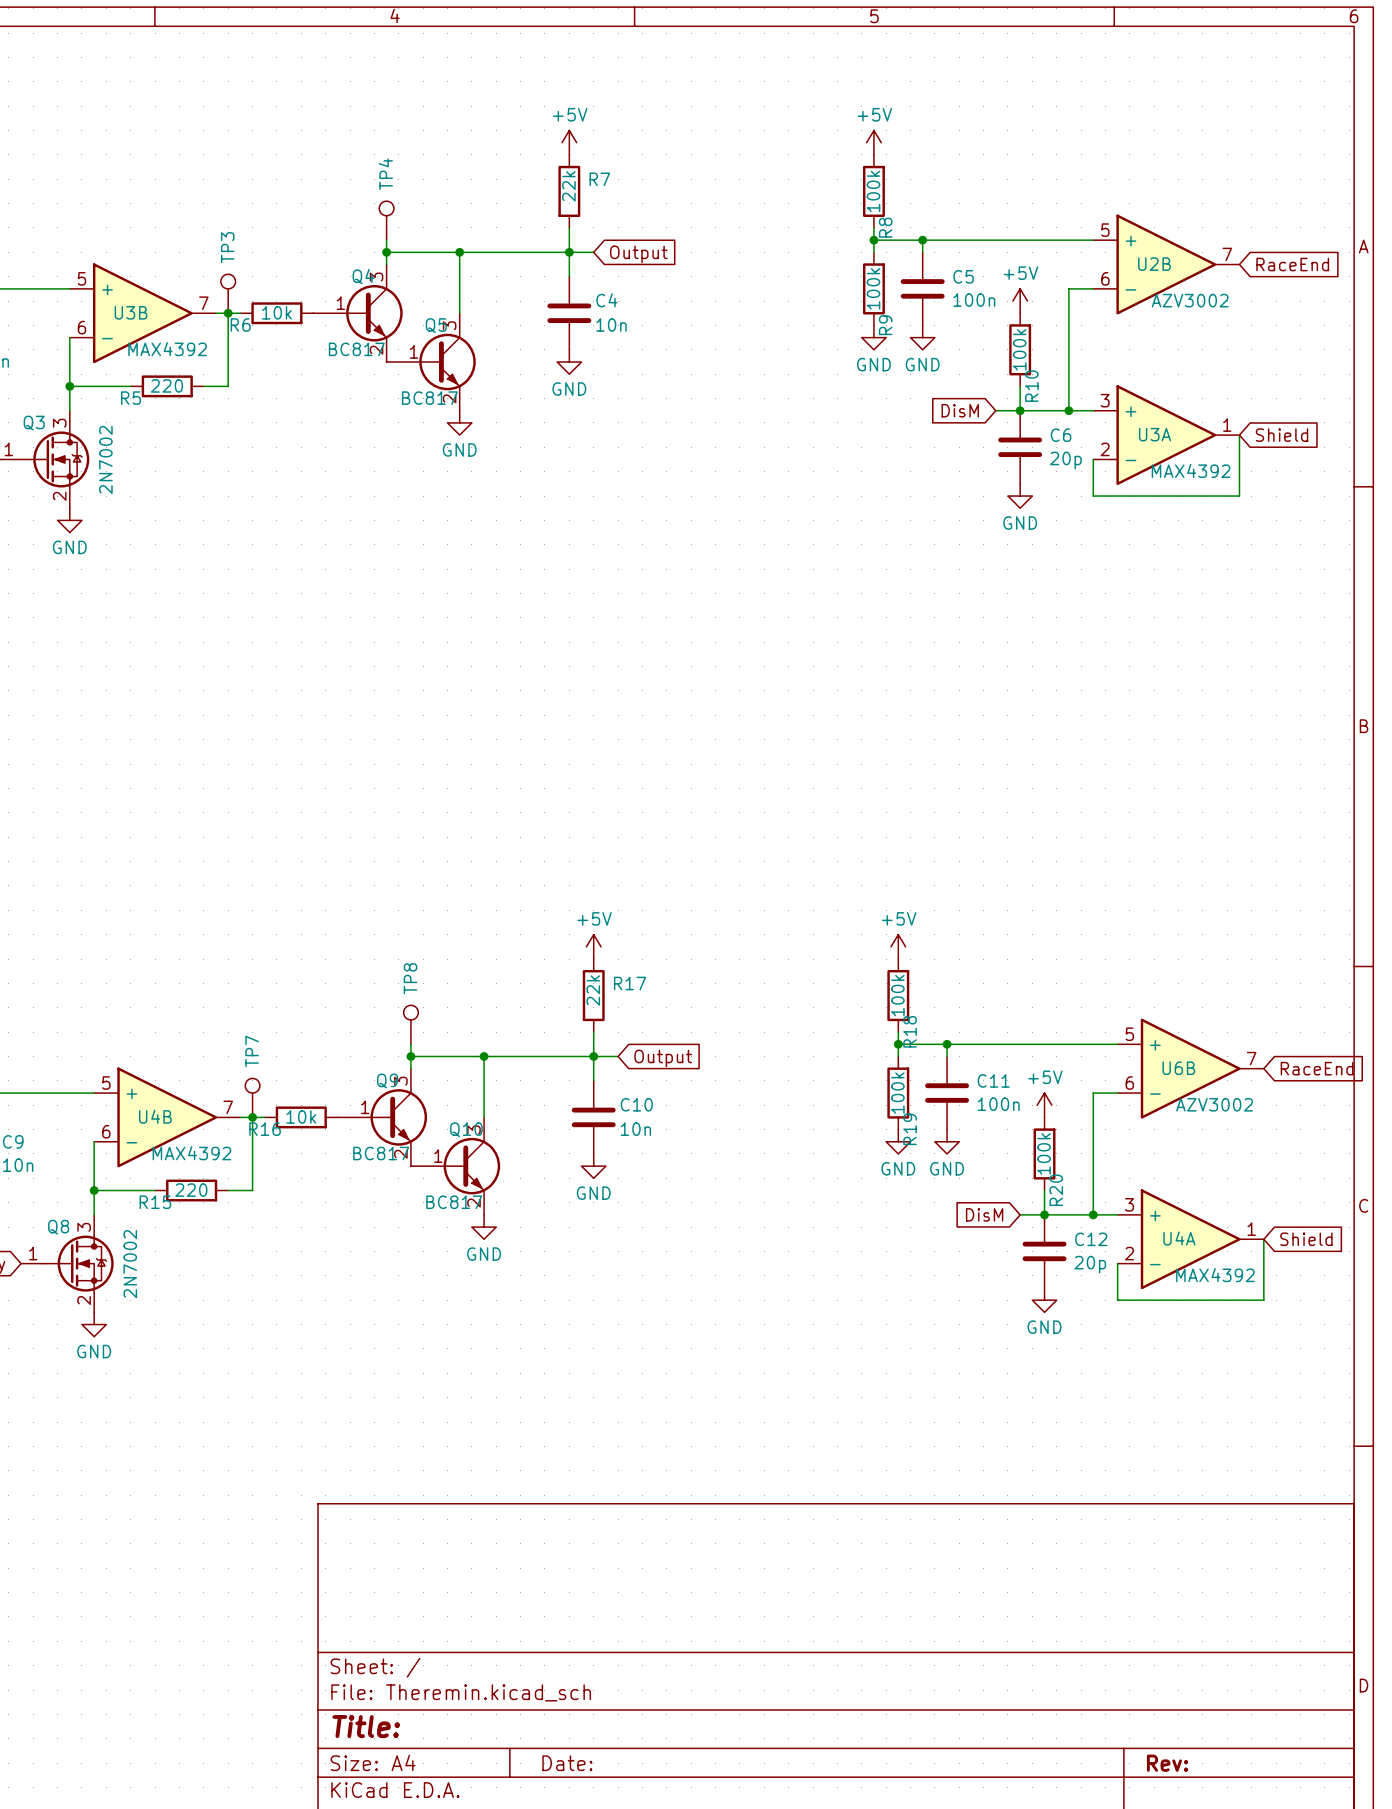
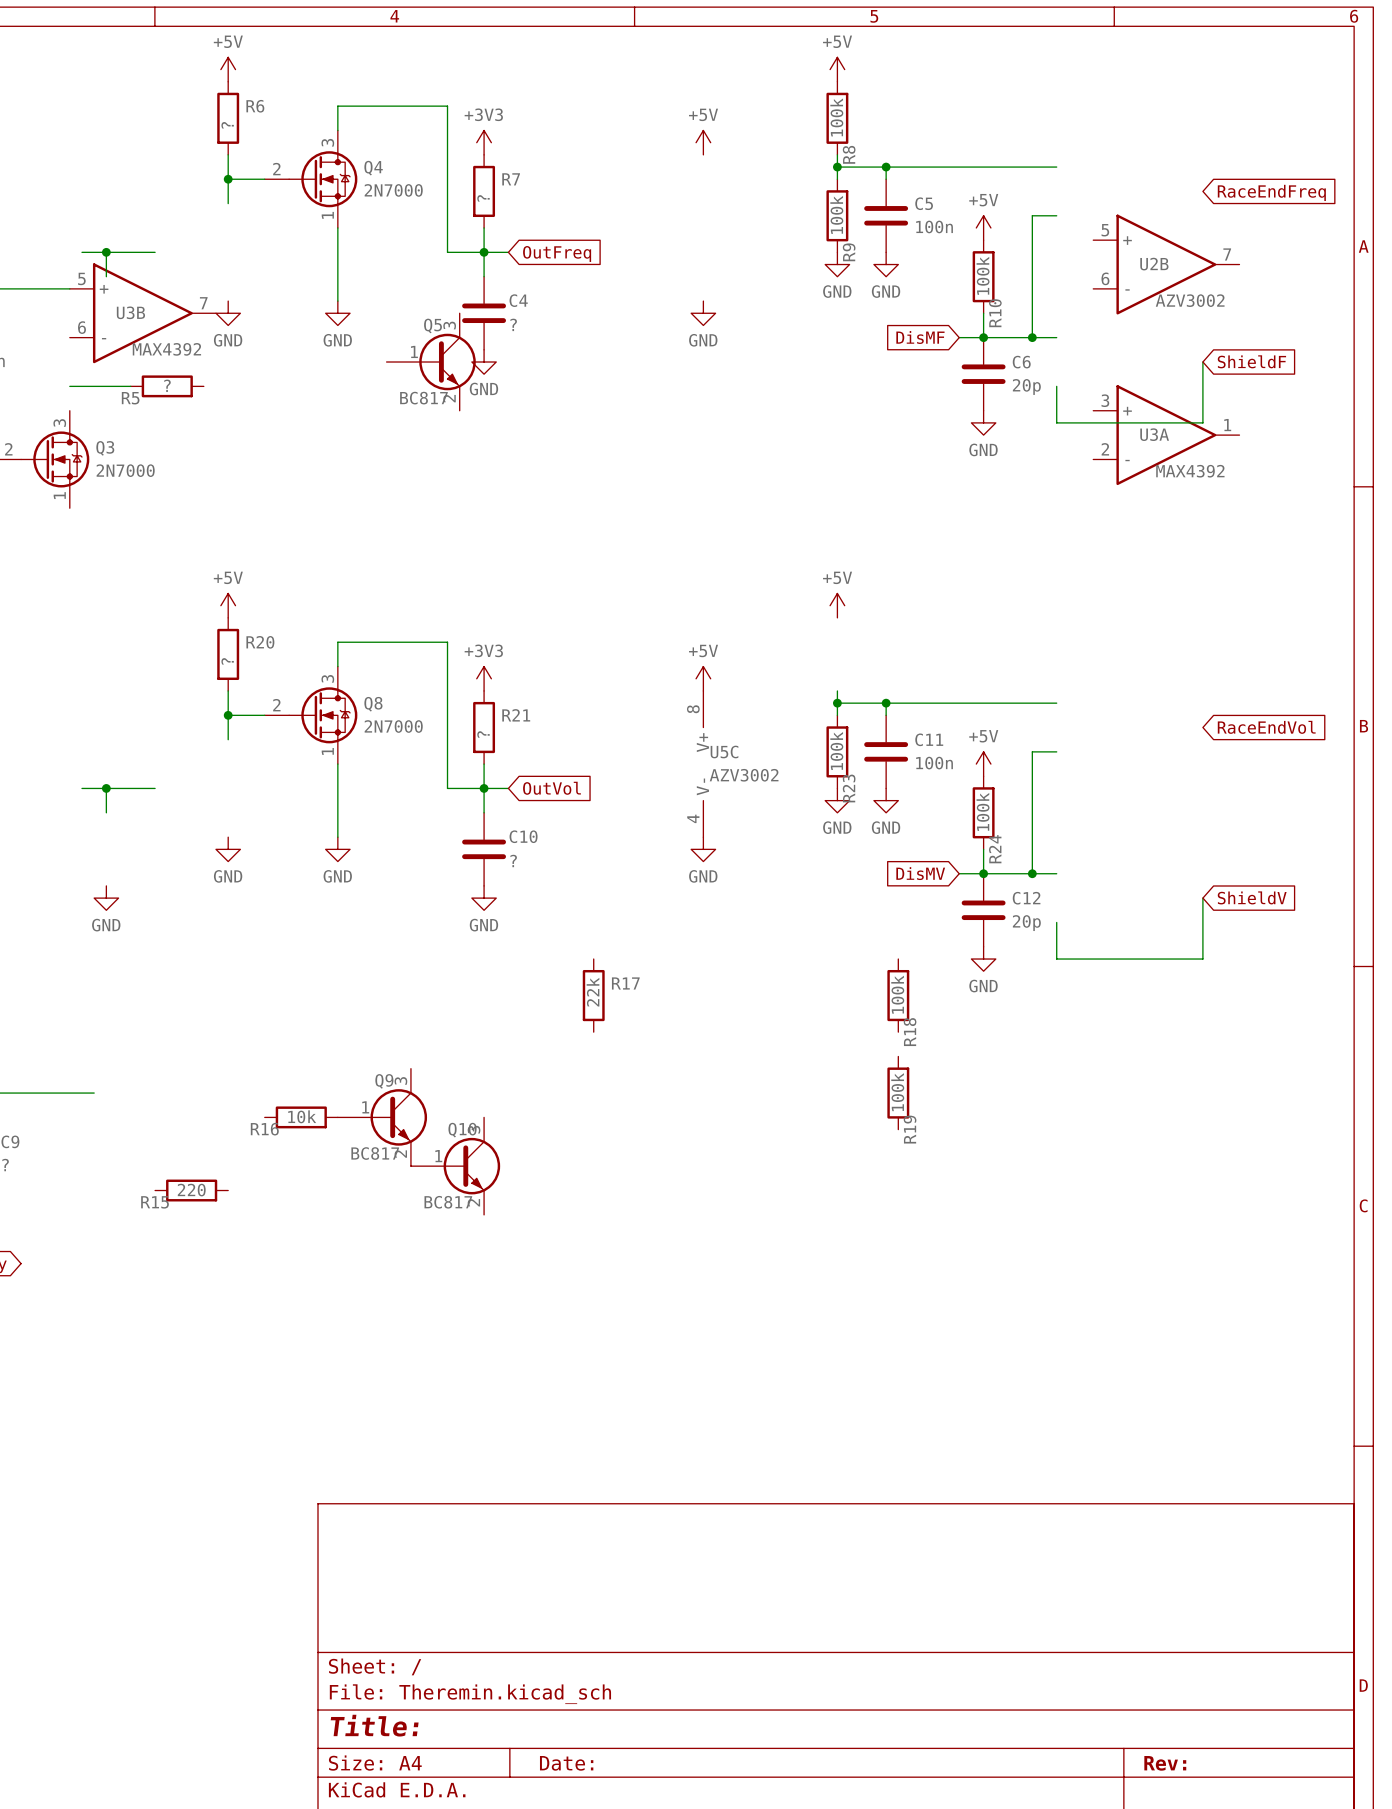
power symbol: none -> +5V (228, 69)
power symbol: none -> +5V (837, 69)
power symbol: none -> +3V3 (484, 142)
power symbol: +5V (569, 142) -> none
power symbol: none -> +5V (703, 142)
power symbol: +5V (873, 142) -> none
wire: none -> (228, 154) (228, 203)
junction: none -> (837, 167)
junction: none -> (886, 167)
wire: none -> (228, 179) (264, 179)
junction: none -> (228, 179)
R7 value: 22k (568, 186) -> ? (483, 198)
R7 position: (569, 191) -> (484, 191)
R8 position: (873, 191) -> (837, 118)
global label: none -> RaceEndFreq (1271, 192)
TP4: (386, 220) -> none
wire: none -> (337, 227) (337, 301)
wire: (569, 227) (569, 276) -> (484, 227) (484, 276)
wire: (873, 227) (873, 252) -> (837, 154) (837, 179)
power symbol: none -> +5V (983, 227)
wire: (386, 240) (386, 264) -> none
wire: (873, 240) (1093, 240) -> (837, 167) (1056, 167)
junction: (873, 240) -> none
wire: (922, 240) (922, 252) -> (886, 167) (886, 179)
junction: (922, 240) -> none
wire: none -> (81, 252) (155, 252)
wire: none -> (106, 252) (106, 276)
junction: none -> (106, 252)
wire: (386, 252) (447, 252) -> (337, 130) (337, 106) (447, 106) (447, 252)
junction: (386, 252) -> none
wire: (459, 252) (459, 313) -> none
junction position: (459, 252) -> (484, 252)
wire: (508, 252) (593, 252) -> none
junction: (569, 252) -> none
global label: none -> OutFreq (557, 253)
global label: Output (638, 254) -> none
Q4 symbol: [313, 264, 403, 363] -> [264, 130, 358, 228]
power symbol: none -> GND (837, 264)
power symbol: none -> GND (886, 264)
global label: RaceEnd (1292, 264) -> none
Q4 name position: Q4 (363, 276) -> Q4 (373, 168)
R9 position: (873, 288) -> (837, 215)
C5 position: (922, 288) -> (886, 215)
wire: (1093, 288) (1068, 288) (1068, 410) -> (1056, 215) (1032, 215) (1032, 337)
TP3: (228, 293) -> none
power symbol: +5V (1020, 301) -> none
R6 value: 10k (276, 312) -> ? (227, 125)
wire: (228, 313) (228, 386) (203, 386) -> none
junction: (228, 313) -> none
power symbol: none -> GND (228, 313)
R6 rotation: 0° (276, 313) -> 90° clockwise (228, 118)
R6 position: (276, 313) -> (228, 118)
power symbol: none -> GND (337, 313)
C4 position: (569, 313) -> (484, 313)
power symbol: none -> GND (703, 313)
R6 name position: R6 (240, 324) -> R6 (255, 106)
C4 value: 10n (611, 324) -> ? (513, 324)
wire: (69, 337) (69, 410) -> none
power symbol: GND (873, 337) -> none
global label: none -> DisMF (920, 337)
power symbol: GND (922, 337) -> none
junction: none -> (983, 337)
junction: none -> (1032, 337)
Q4 value: BC817 (356, 349) -> 2N7000 (393, 190)
R10 position: (1020, 349) -> (983, 276)
power symbol: none -> GND (484, 362)
power symbol: GND (569, 362) -> none
global label: none -> ShieldF (1251, 361)
R5 value: 220 (166, 385) -> ? (167, 385)
junction: (69, 386) -> none
wire: (1020, 386) (1020, 410) -> (983, 313) (983, 337)
global label: DisM (960, 410) -> none
wire: (995, 410) (1093, 410) -> (959, 337) (1056, 337)
junction: (1020, 410) -> none
junction: (1068, 410) -> none
power symbol: GND (459, 422) -> none
power symbol: none -> GND (983, 422)
Q3 name position: Q3 (34, 423) -> Q3 (105, 448)
wire: (1239, 435) (1239, 496) (1093, 496) (1093, 459) -> (1202, 362) (1202, 422) (1056, 422) (1056, 386)
global label: Shield (1281, 435) -> none
C6 position: (1020, 447) -> (983, 374)
Q3 pin number: 1 (8, 449) -> 2 (8, 449)
Q3 value: 2N7002 (105, 459) -> 2N7000 (125, 470)
Q3 pin number: 2 (59, 496) -> 1 (59, 495)
power symbol: GND (1020, 496) -> none
power symbol: GND (69, 520) -> none
power symbol: none -> +5V (228, 605)
power symbol: none -> +5V (837, 605)
wire: none -> (337, 666) (337, 642) (447, 642) (447, 788) (508, 788)
power symbol: none -> +3V3 (484, 678)
power symbol: none -> +5V (703, 678)
wire: none -> (228, 690) (228, 739)
wire: none -> (837, 690) (837, 715)
wire: none -> (837, 703) (1056, 703)
junction: none -> (837, 703)
wire: none -> (886, 703) (886, 715)
junction: none -> (886, 703)
wire: none -> (228, 715) (264, 715)
junction: none -> (228, 715)
R21: none -> ? (484, 727)
global label: none -> RaceEndVol (1266, 727)
R23: none -> 100k (837, 751)
wire: none -> (1056, 751) (1032, 751) (1032, 873)
wire: none -> (337, 764) (337, 837)
wire: none -> (484, 764) (484, 812)
U5C: none -> AZV3002 (703, 764)
power symbol: none -> +5V (983, 764)
wire: none -> (81, 788) (155, 788)
wire: none -> (106, 788) (106, 812)
junction: none -> (106, 788)
junction: none -> (484, 788)
global label: none -> OutVol (551, 788)
power symbol: none -> GND (837, 800)
power symbol: none -> GND (886, 800)
R24: none -> 100k (983, 812)
power symbol: none -> GND (228, 849)
power symbol: none -> GND (337, 849)
power symbol: none -> GND (703, 849)
global label: none -> DisMV (920, 873)
wire: none -> (959, 873) (1056, 873)
junction: none -> (983, 873)
junction: none -> (1032, 873)
power symbol: none -> GND (106, 898)
power symbol: none -> GND (484, 898)
wire: none -> (1202, 898) (1202, 959) (1056, 959) (1056, 922)
global label: none -> ShieldV (1252, 897)
power symbol: +5V (593, 946) -> none
power symbol: +5V (898, 946) -> none
power symbol: none -> GND (983, 959)
TP8: (410, 1024) -> none
wire: (593, 1032) (593, 1080) -> none
wire: (898, 1032) (898, 1056) -> (983, 849) (983, 873)
wire: (410, 1044) (410, 1068) -> none
wire: (898, 1044) (1117, 1044) -> none
junction: (898, 1044) -> none
wire: (947, 1044) (947, 1056) -> none
junction: (947, 1044) -> none
wire: (410, 1056) (618, 1056) -> none
junction: (410, 1056) -> none
wire: (484, 1056) (484, 1117) -> none
junction: (484, 1056) -> none
junction: (593, 1056) -> none
global label: Output (663, 1058) -> none
U6B: AZV3002 (1190, 1068) -> none
global label: RaceEnd (1317, 1068) -> none
C11 position: (947, 1093) -> (886, 751)
wire: (1117, 1093) (1093, 1093) (1093, 1214) -> none
TP7: (252, 1097) -> none
power symbol: +5V (1044, 1105) -> none
U4B: MAX4392 (167, 1117) -> none
wire: (240, 1117) (264, 1117) -> none
wire: (252, 1117) (252, 1190) (228, 1190) -> none
junction: (252, 1117) -> none
C10 position: (593, 1117) -> (484, 849)
C10 value: 10n (635, 1129) -> ? (513, 860)
wire: (94, 1141) (94, 1214) -> none
power symbol: GND (898, 1141) -> none
power symbol: GND (947, 1141) -> none
R20 position: (1044, 1153) -> (228, 654)
R20 value: 100k (1044, 1153) -> ? (227, 661)
C9 value: 10n (18, 1165) -> ? (5, 1165)
power symbol: GND (593, 1166) -> none
wire: (94, 1190) (155, 1190) -> none
junction: (94, 1190) -> none
wire: (1044, 1190) (1044, 1214) -> none
R20 name rotation: 0° (1056, 1190) -> 90° clockwise (260, 642)
R20 name position: R20 (1056, 1190) -> R20 (260, 642)
global label: DisM (984, 1214) -> none
wire: (1020, 1214) (1117, 1214) -> none
junction: (1044, 1214) -> none
junction: (1093, 1214) -> none
Q8 name position: Q8 (58, 1227) -> Q8 (373, 704)
power symbol: GND (484, 1227) -> none
U4A: MAX4392 (1190, 1239) -> none
wire: (1263, 1239) (1263, 1300) (1117, 1300) (1117, 1263) -> none
global label: Shield (1306, 1239) -> none
C12 position: (1044, 1251) -> (983, 910)
Q8 pin number: 1 (33, 1253) -> 2 (276, 705)
Q8 position: (67, 1263) -> (311, 715)
Q8 value: 2N7002 (130, 1264) -> 2N7000 (393, 726)
Q8 pin number: 2 (84, 1300) -> 1 (327, 751)
power symbol: GND (1044, 1300) -> none
power symbol: GND (94, 1324) -> none

